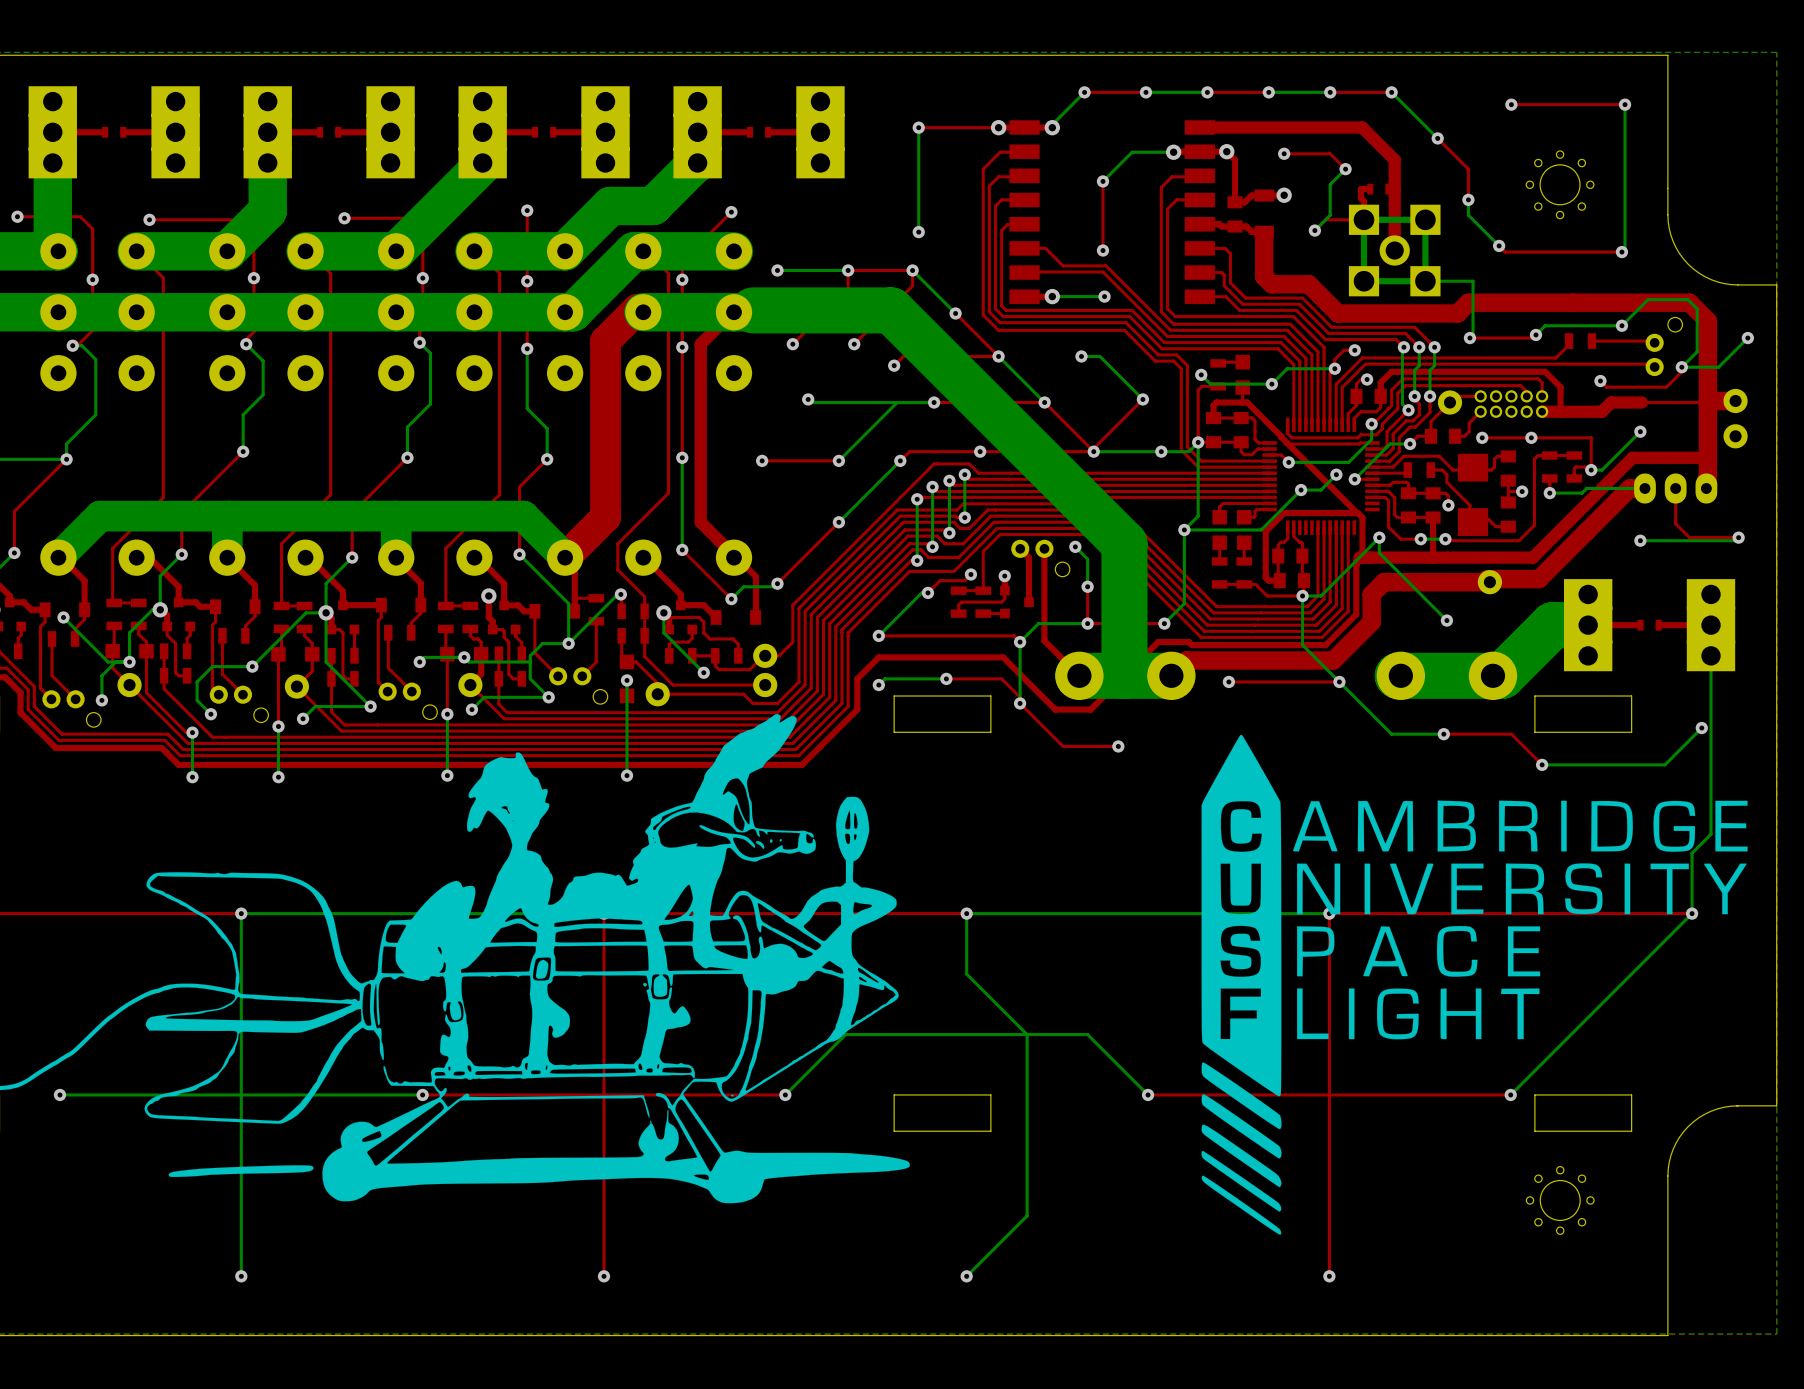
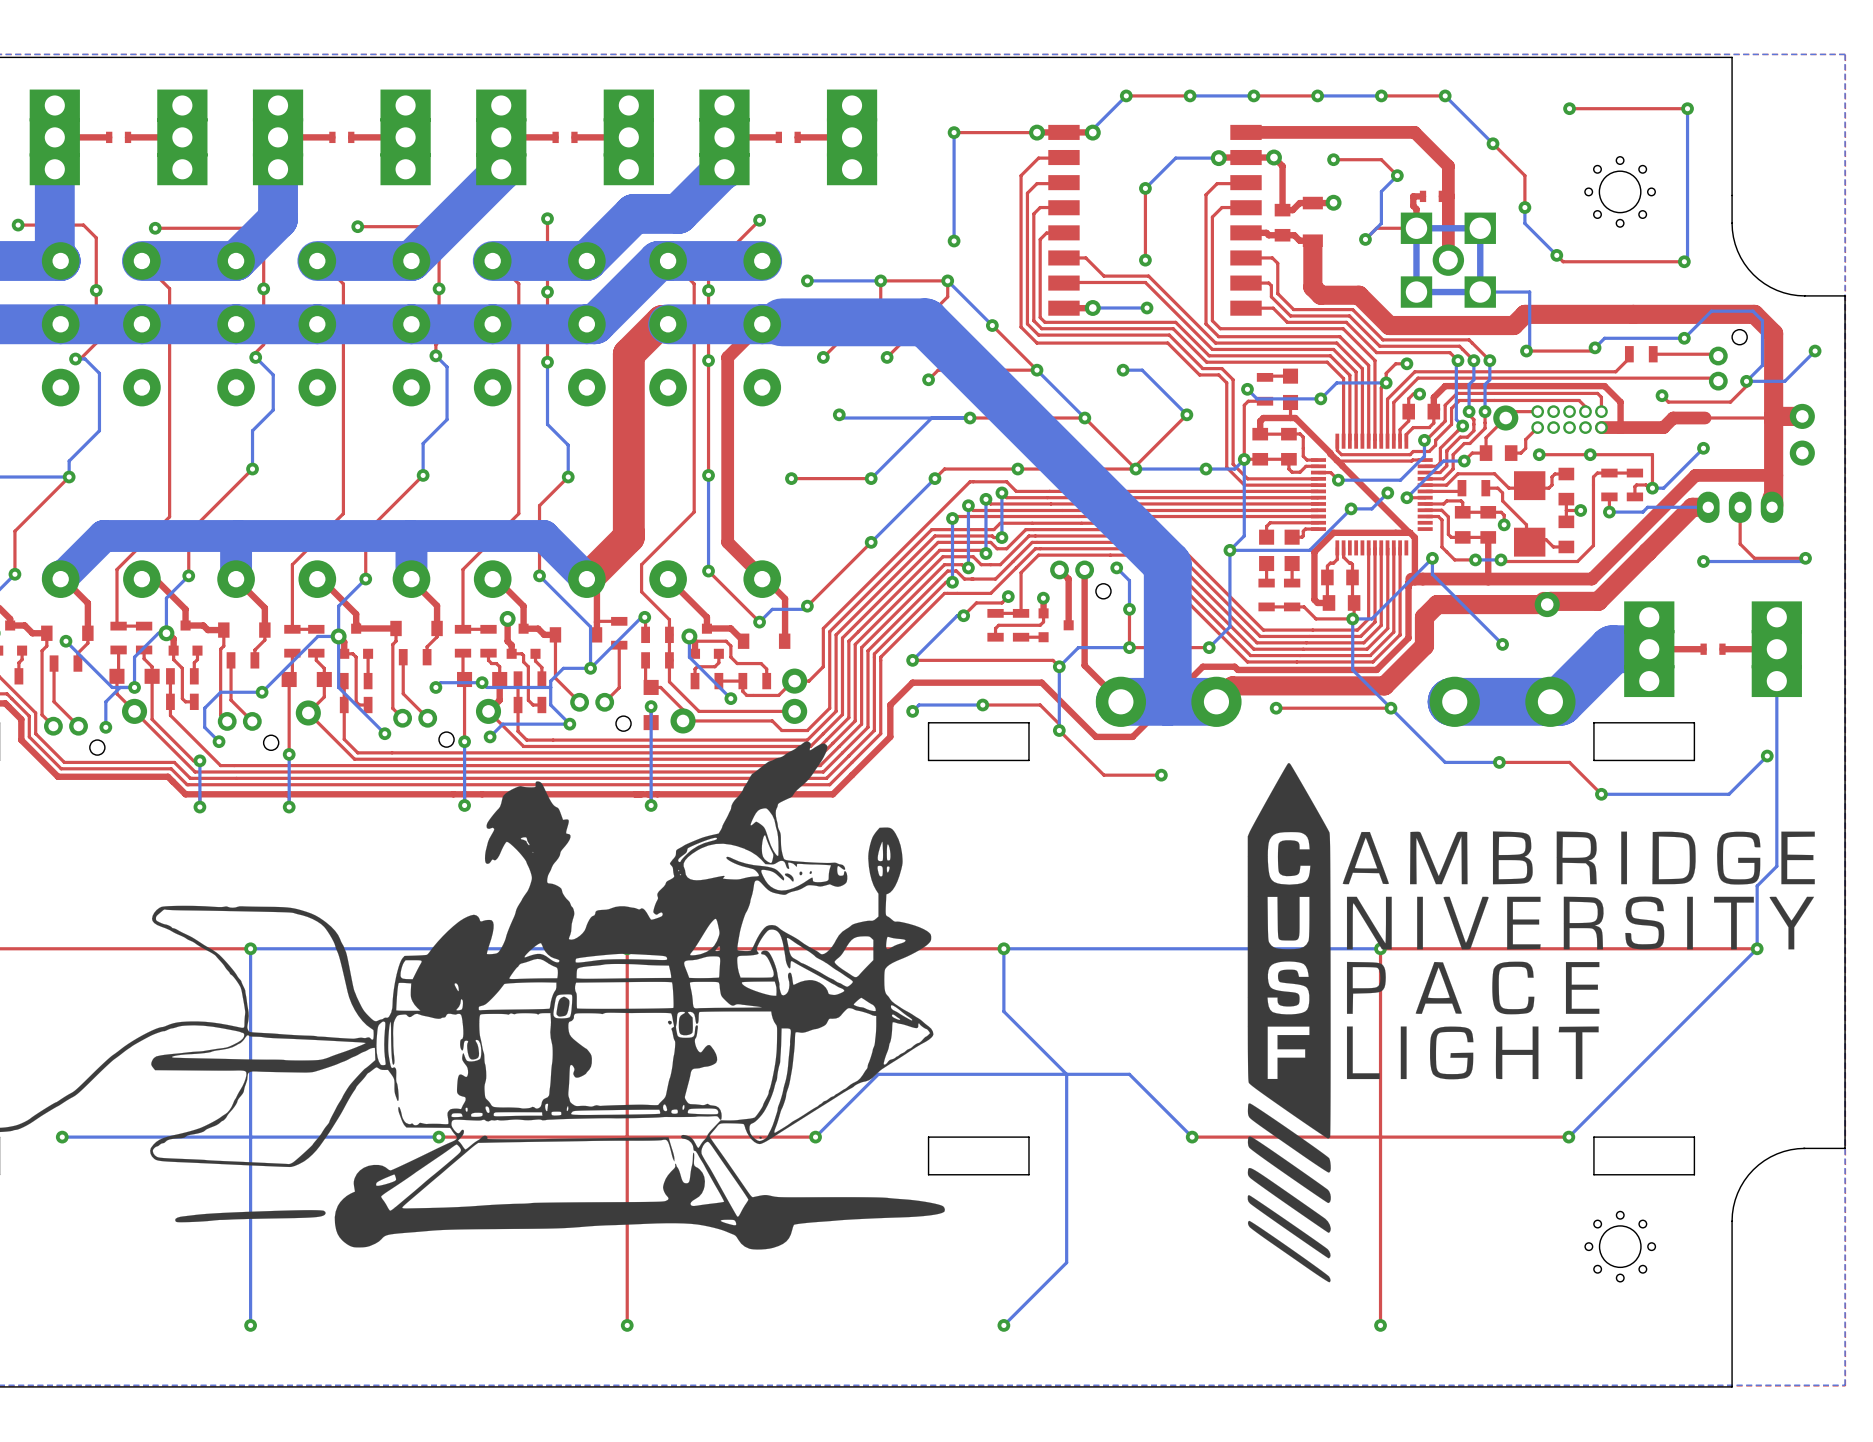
bottom track: (370, 706) (315, 706) (303, 718) -> none
via: (303, 718) -> none

